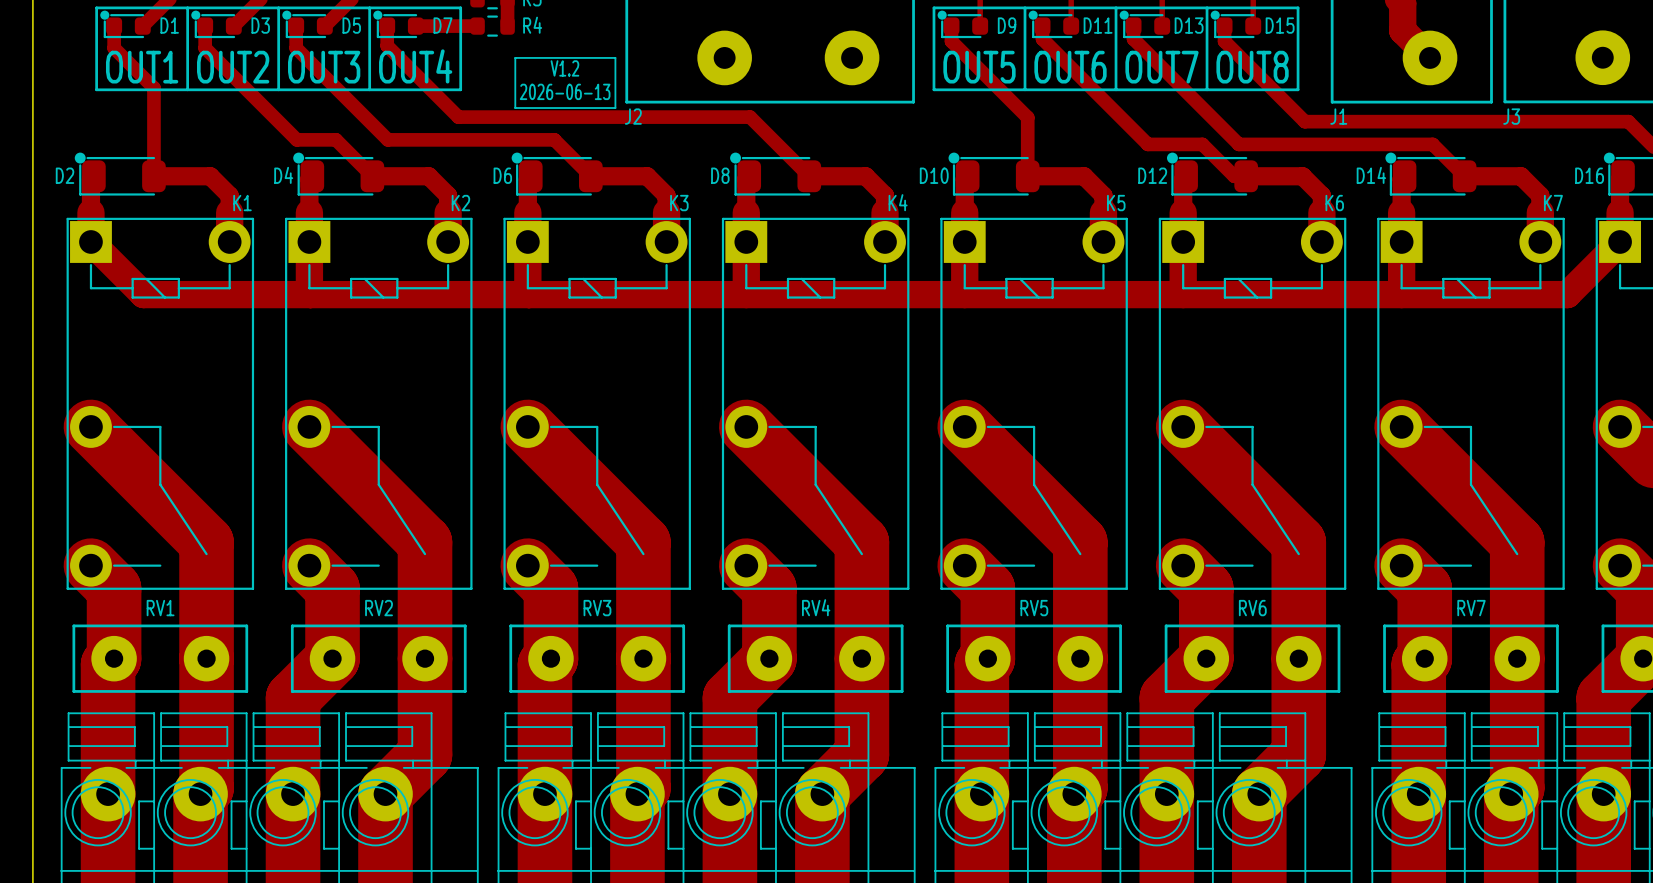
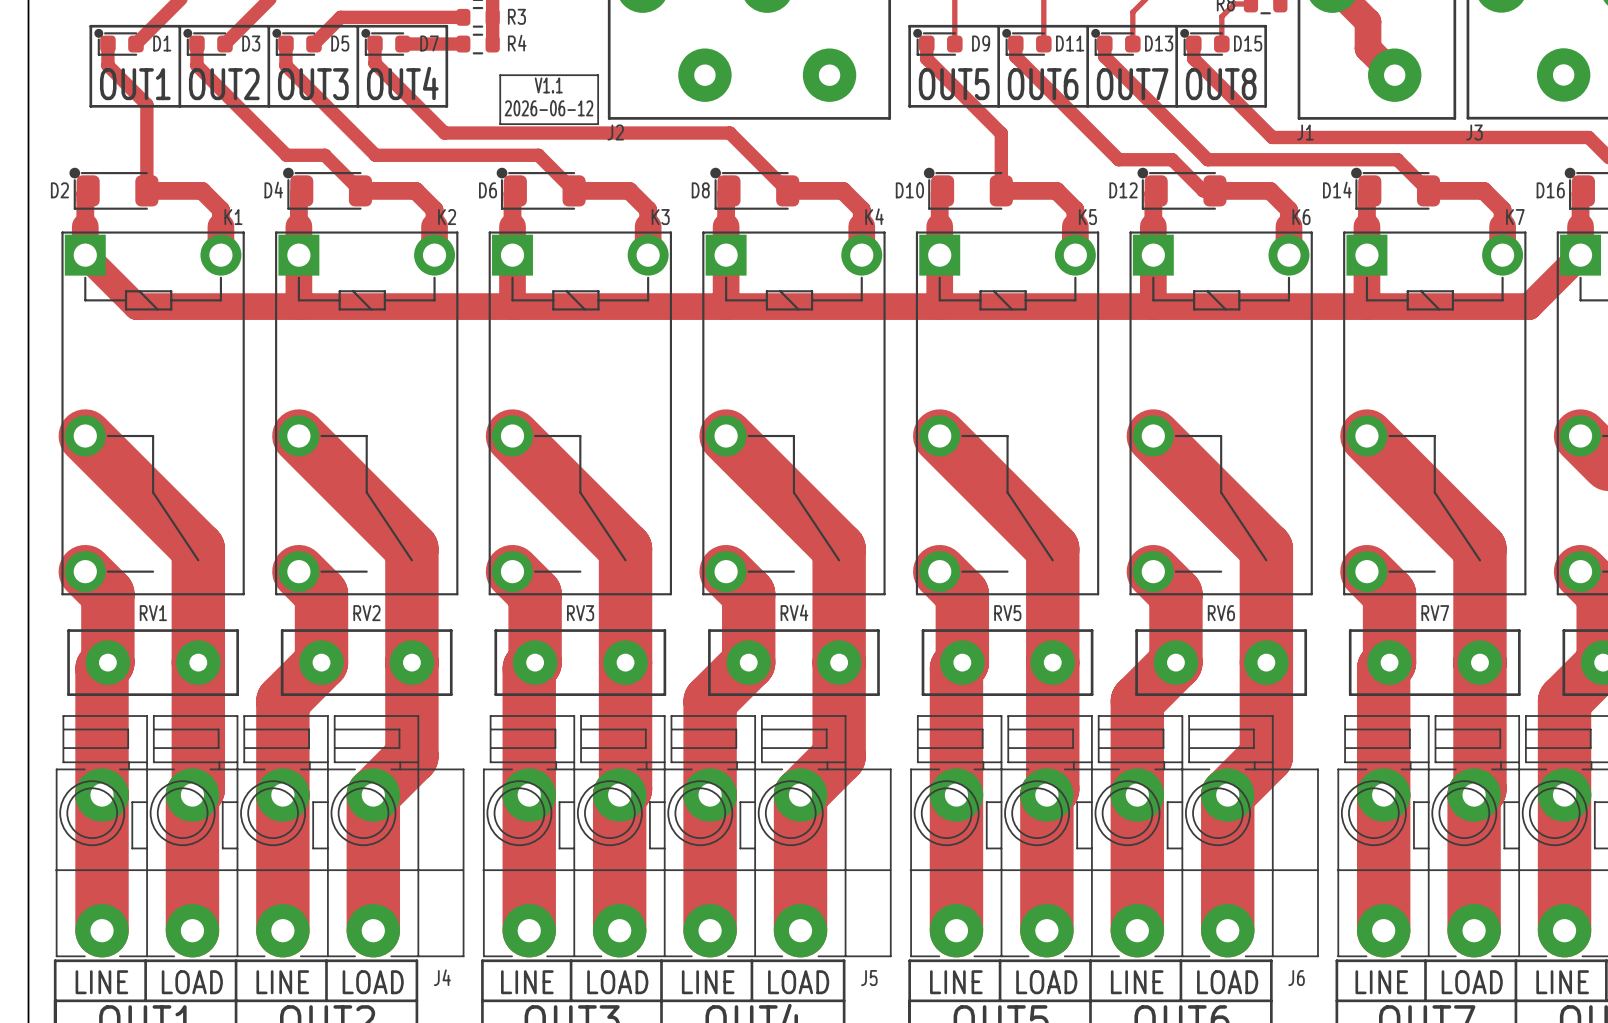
text: V1.2 (564, 68) -> V1.1 (548, 85)
text: 2026-06-13 (565, 91) -> 2026-06-12 (548, 108)

